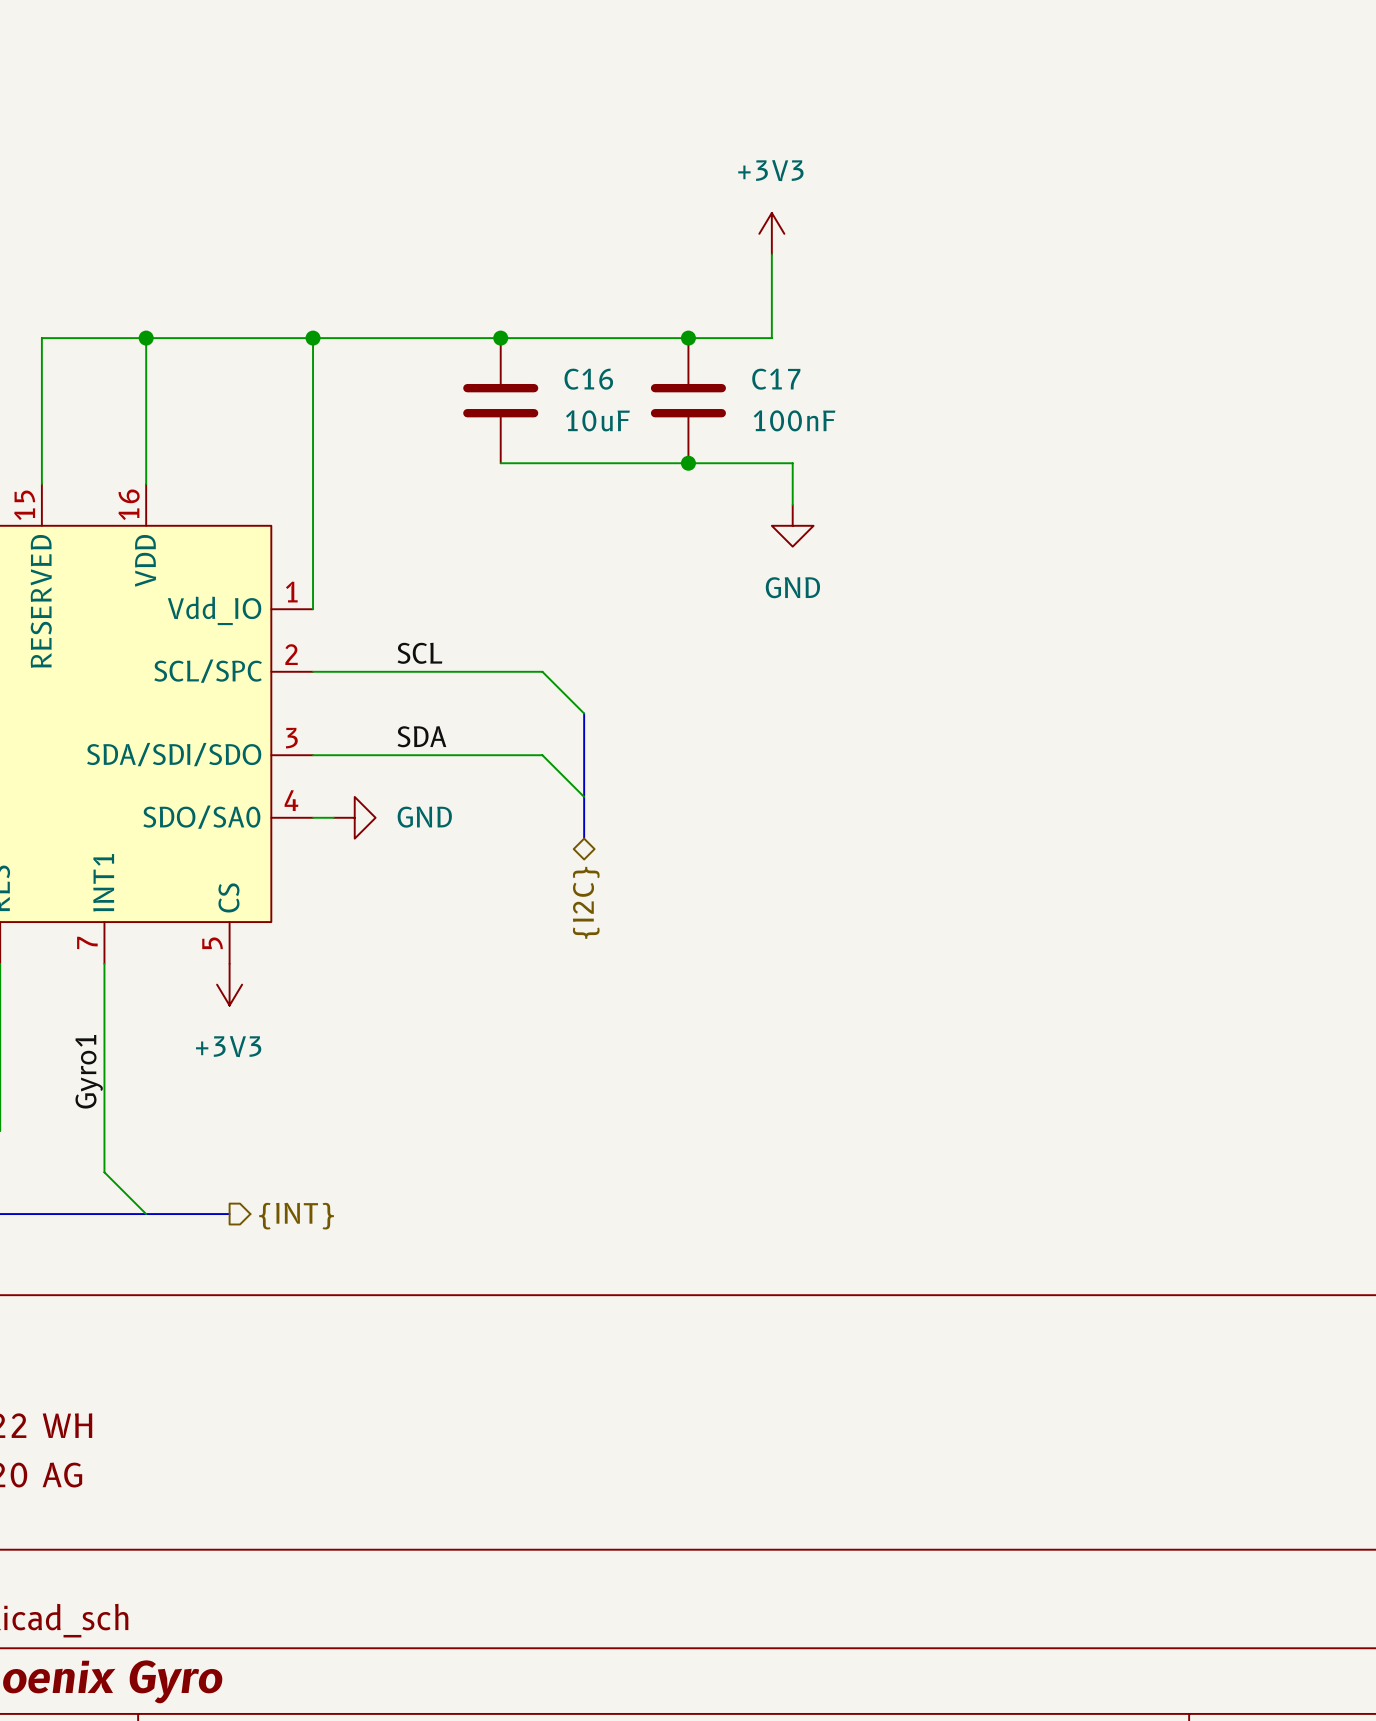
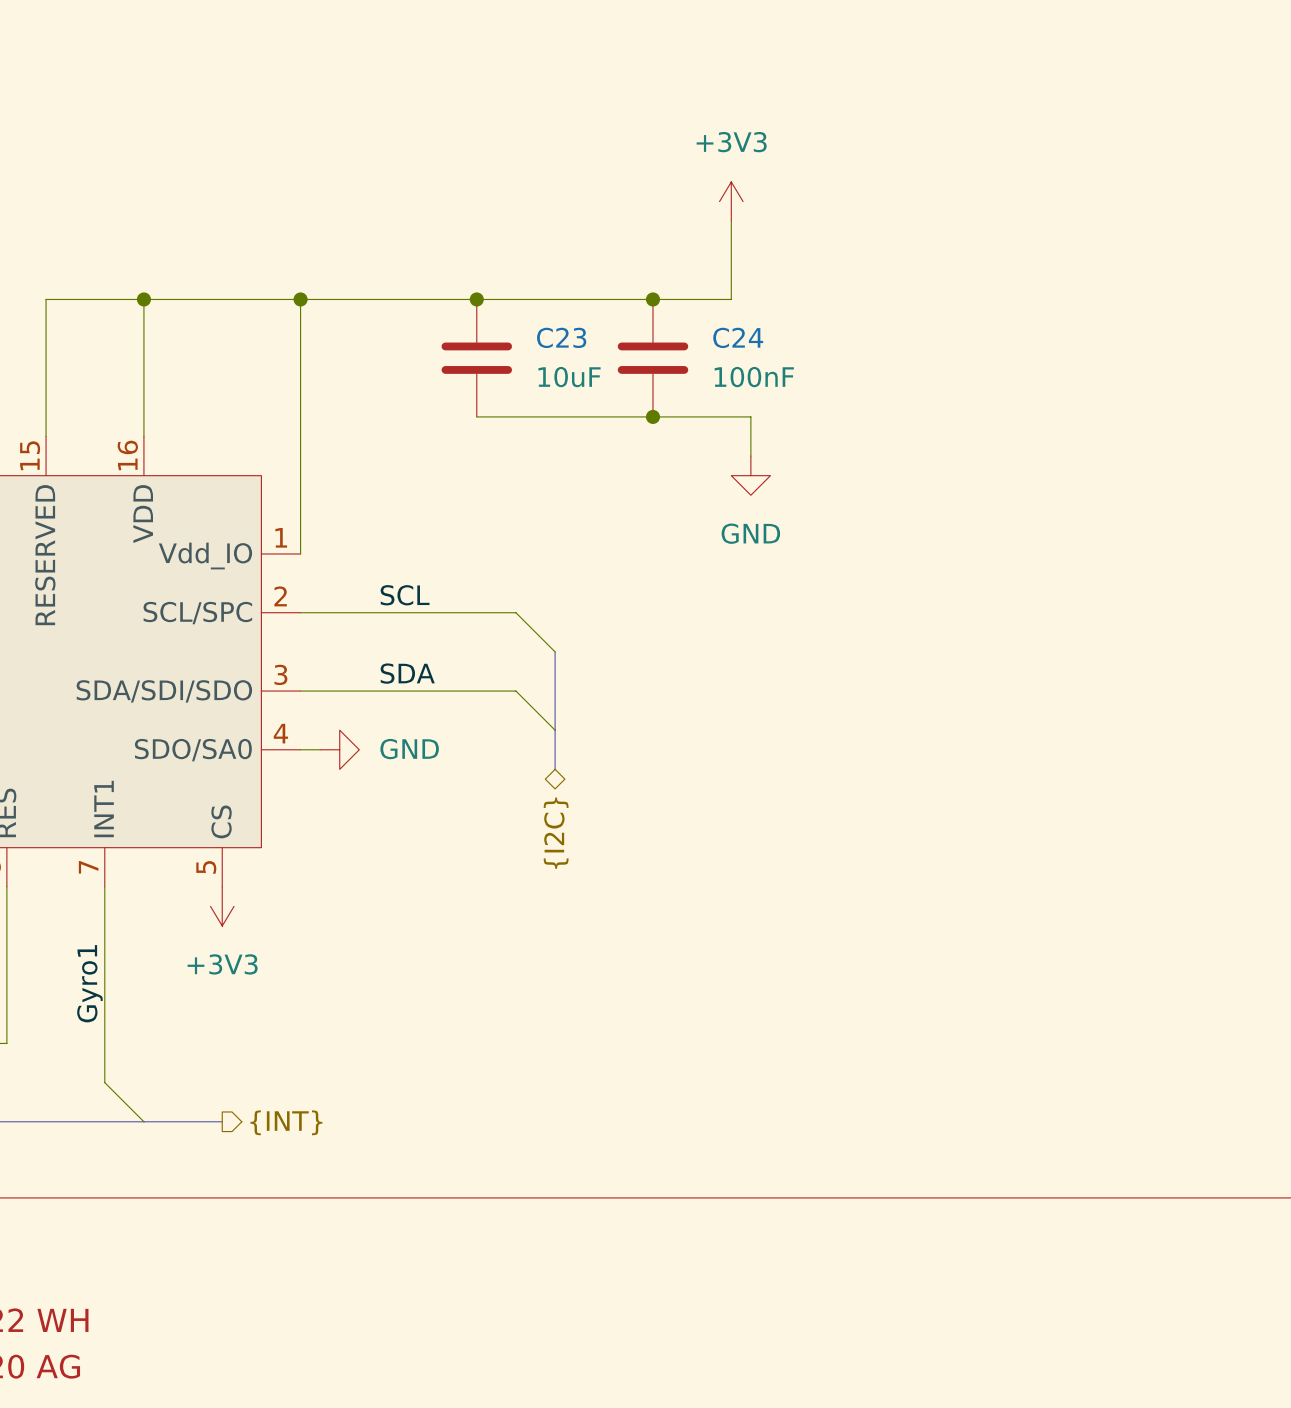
C16 name: C16 (588, 379) -> C23 (561, 337)
C17 name: C17 (776, 379) -> C24 (738, 337)

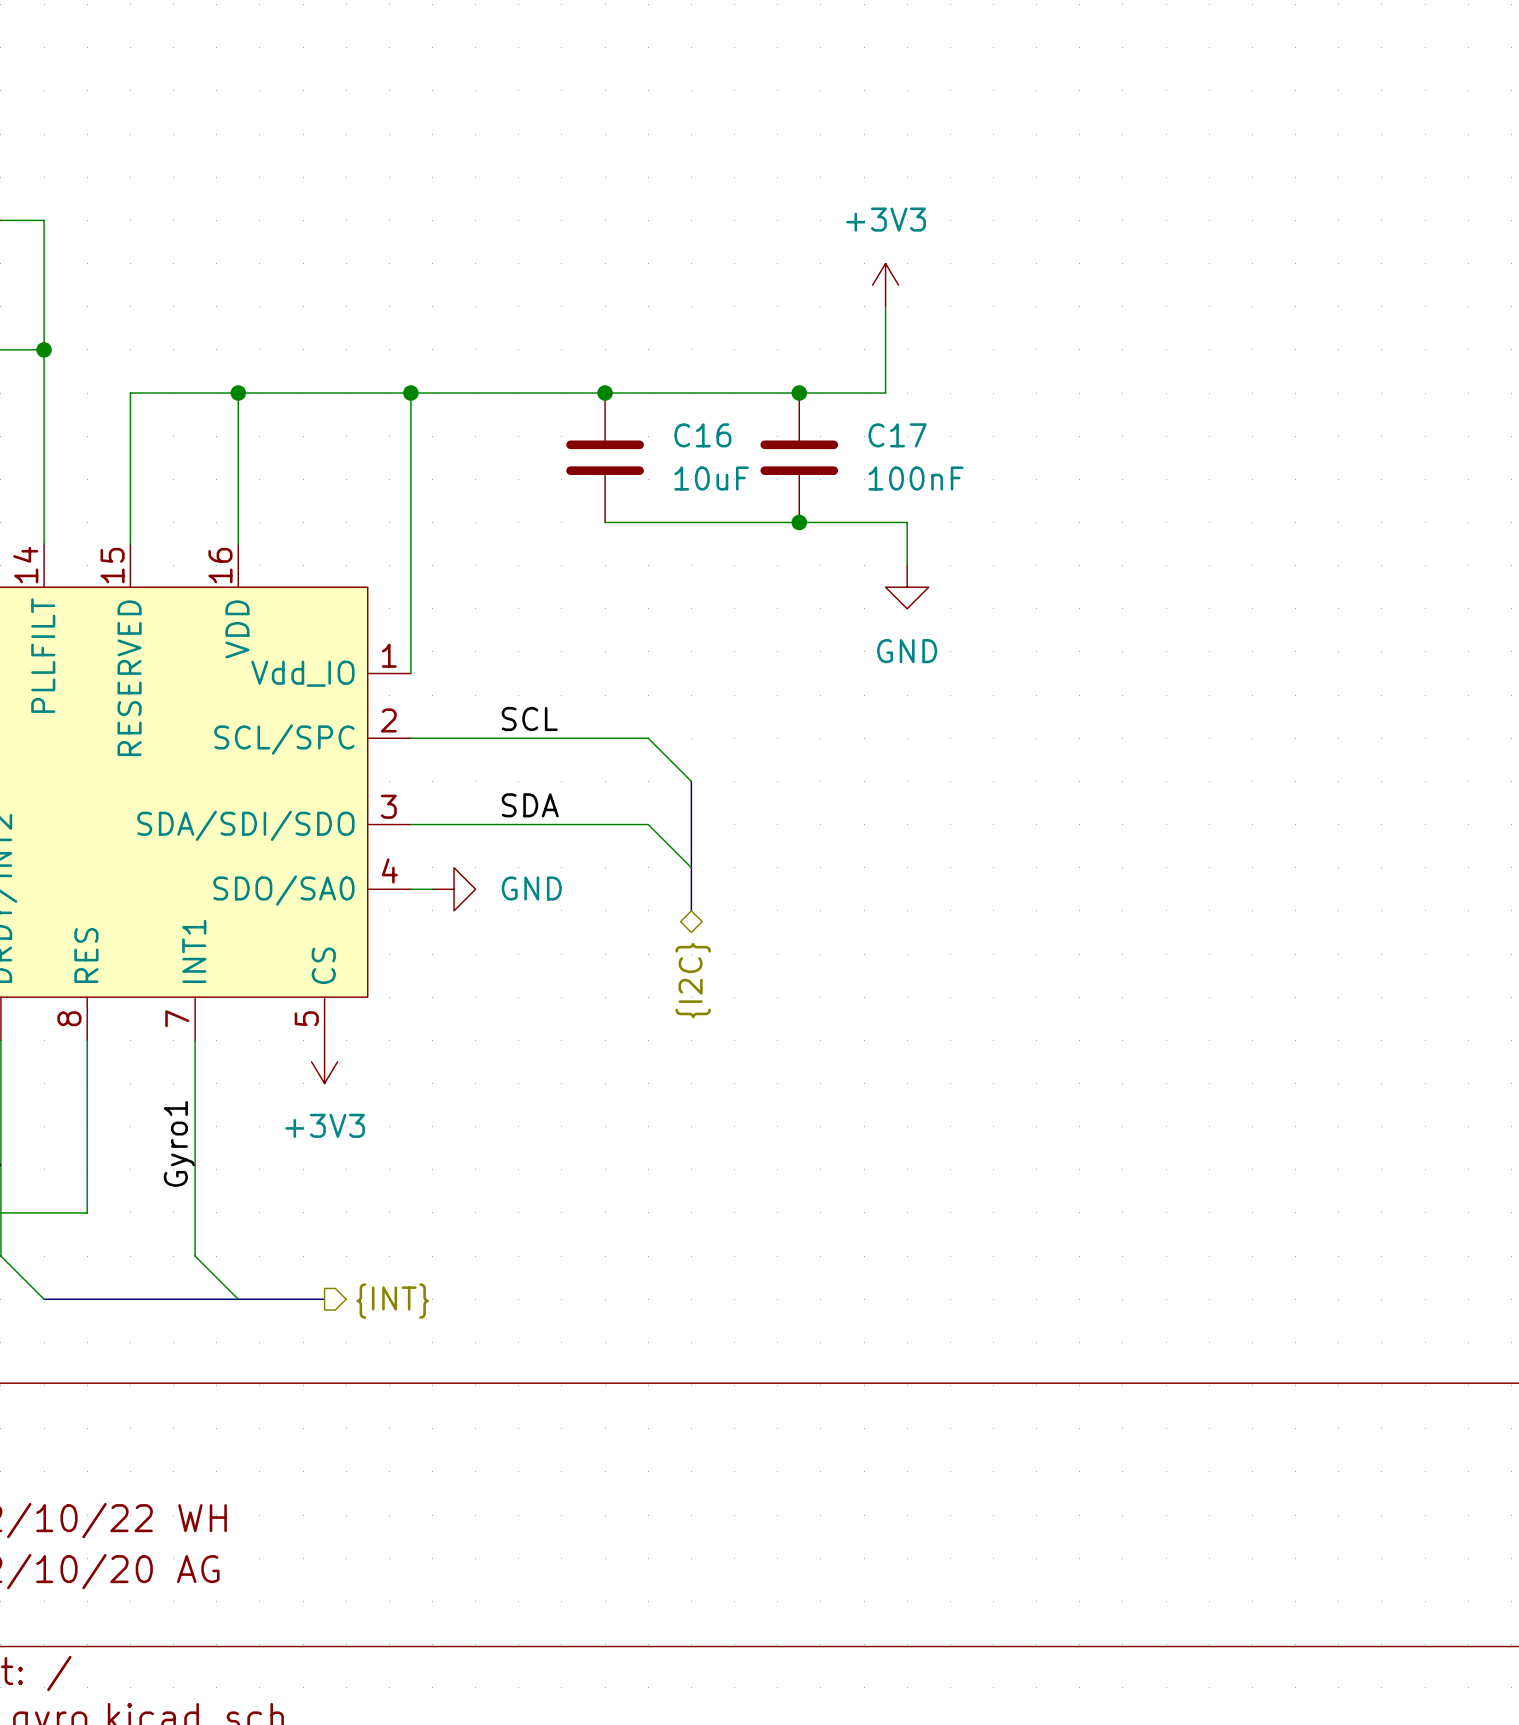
C23 name: C23 (561, 337) -> C16 (702, 435)
C24 name: C24 (738, 337) -> C17 (897, 435)

